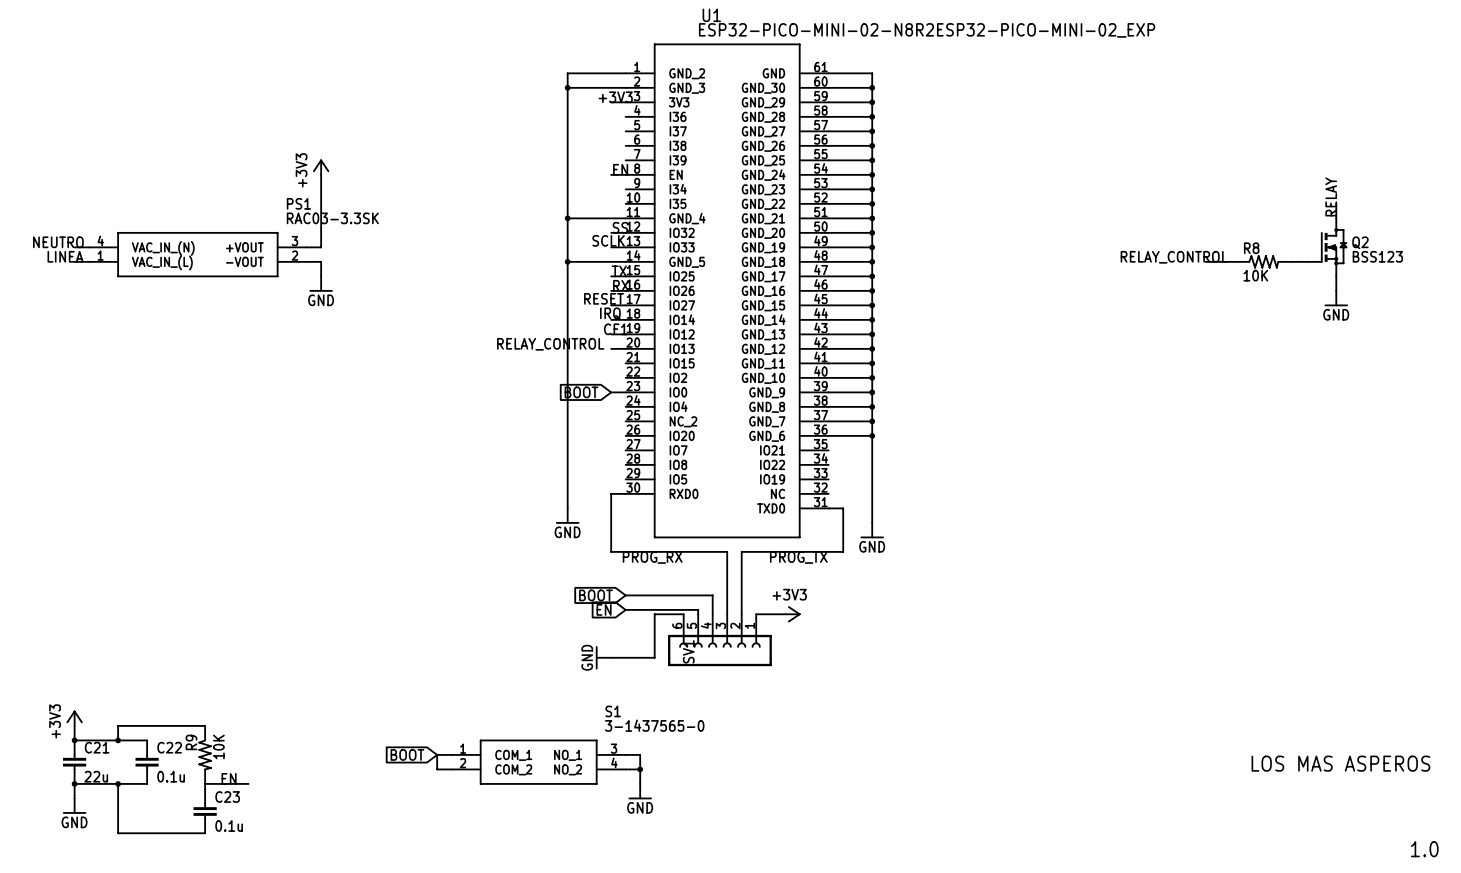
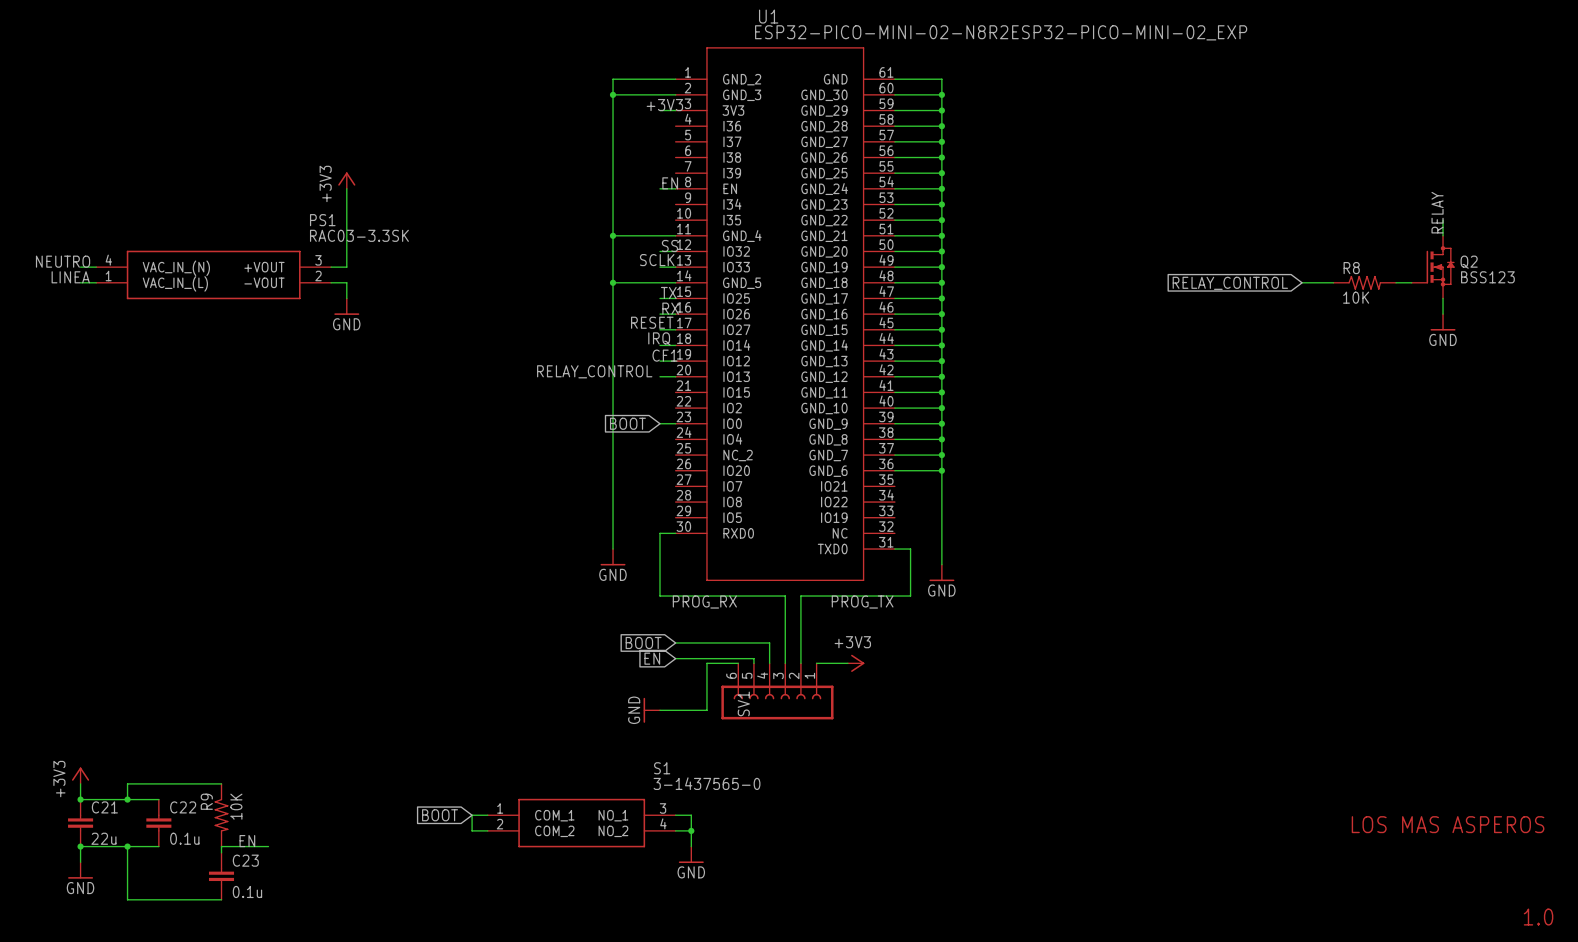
label: RELAY_CONTROL (1174, 257) -> none
global label: none -> RELAY_CONTROL (1230, 283)

